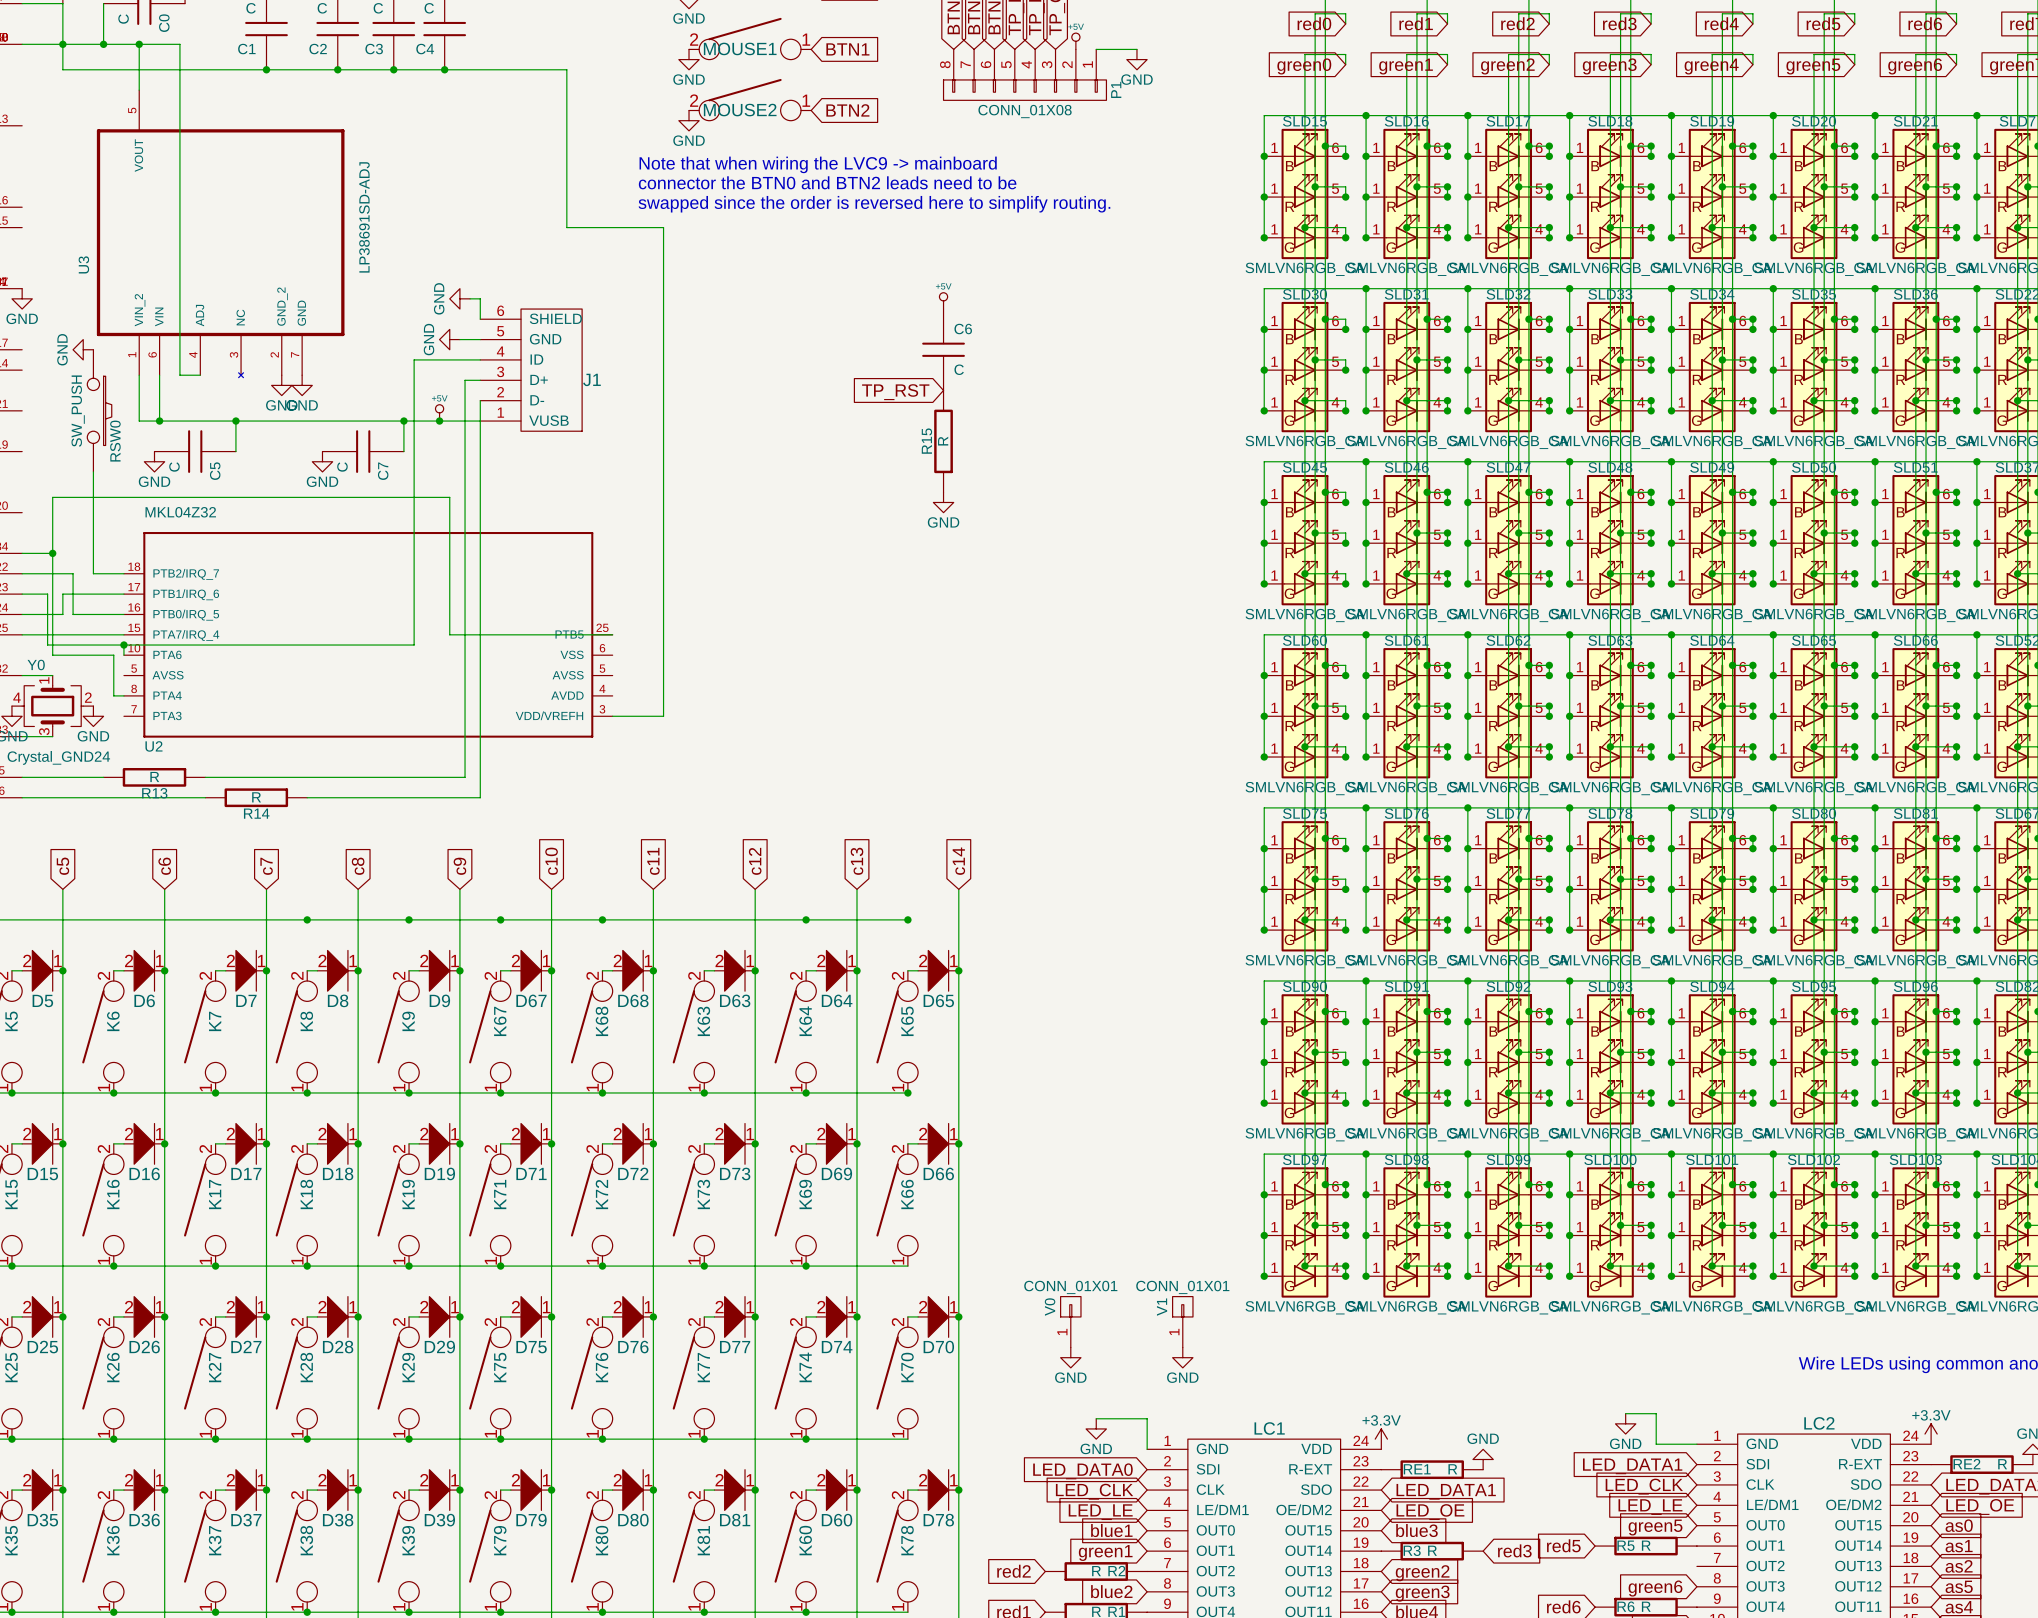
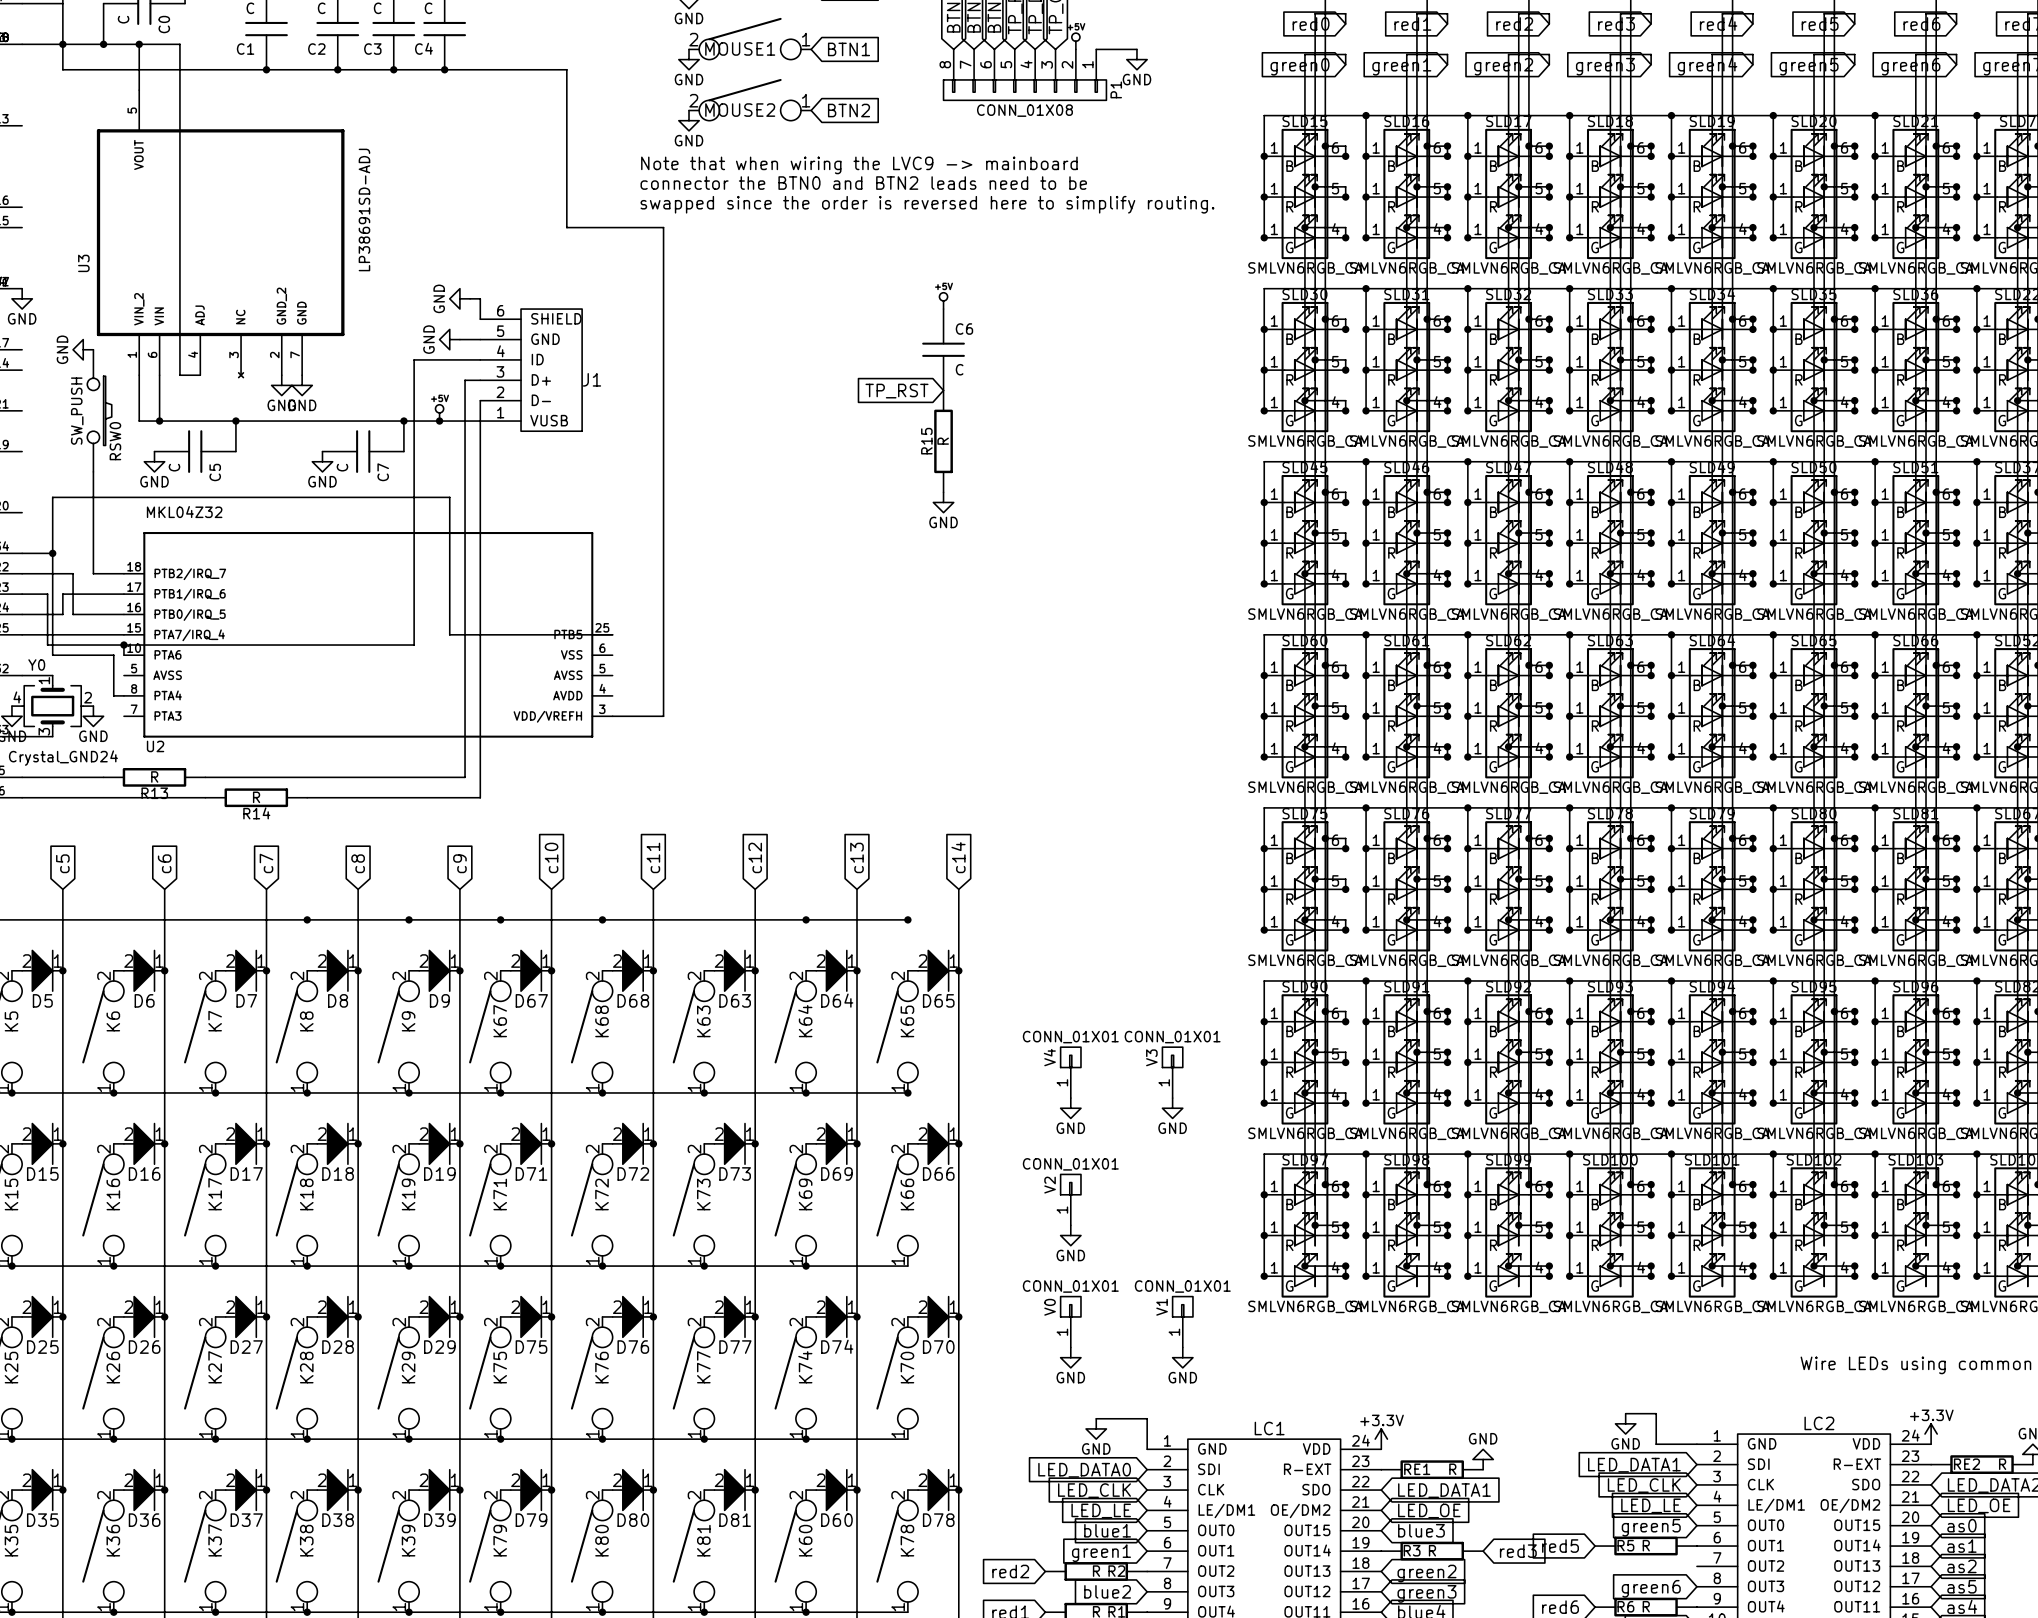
V4: none -> CONN_01X01 (1070, 1072)
V3: none -> CONN_01X01 (1172, 1072)
power symbol: none -> GND (1070, 1108)
power symbol: none -> GND (1172, 1108)
V2: none -> CONN_01X01 (1070, 1199)
power symbol: none -> GND (1070, 1235)

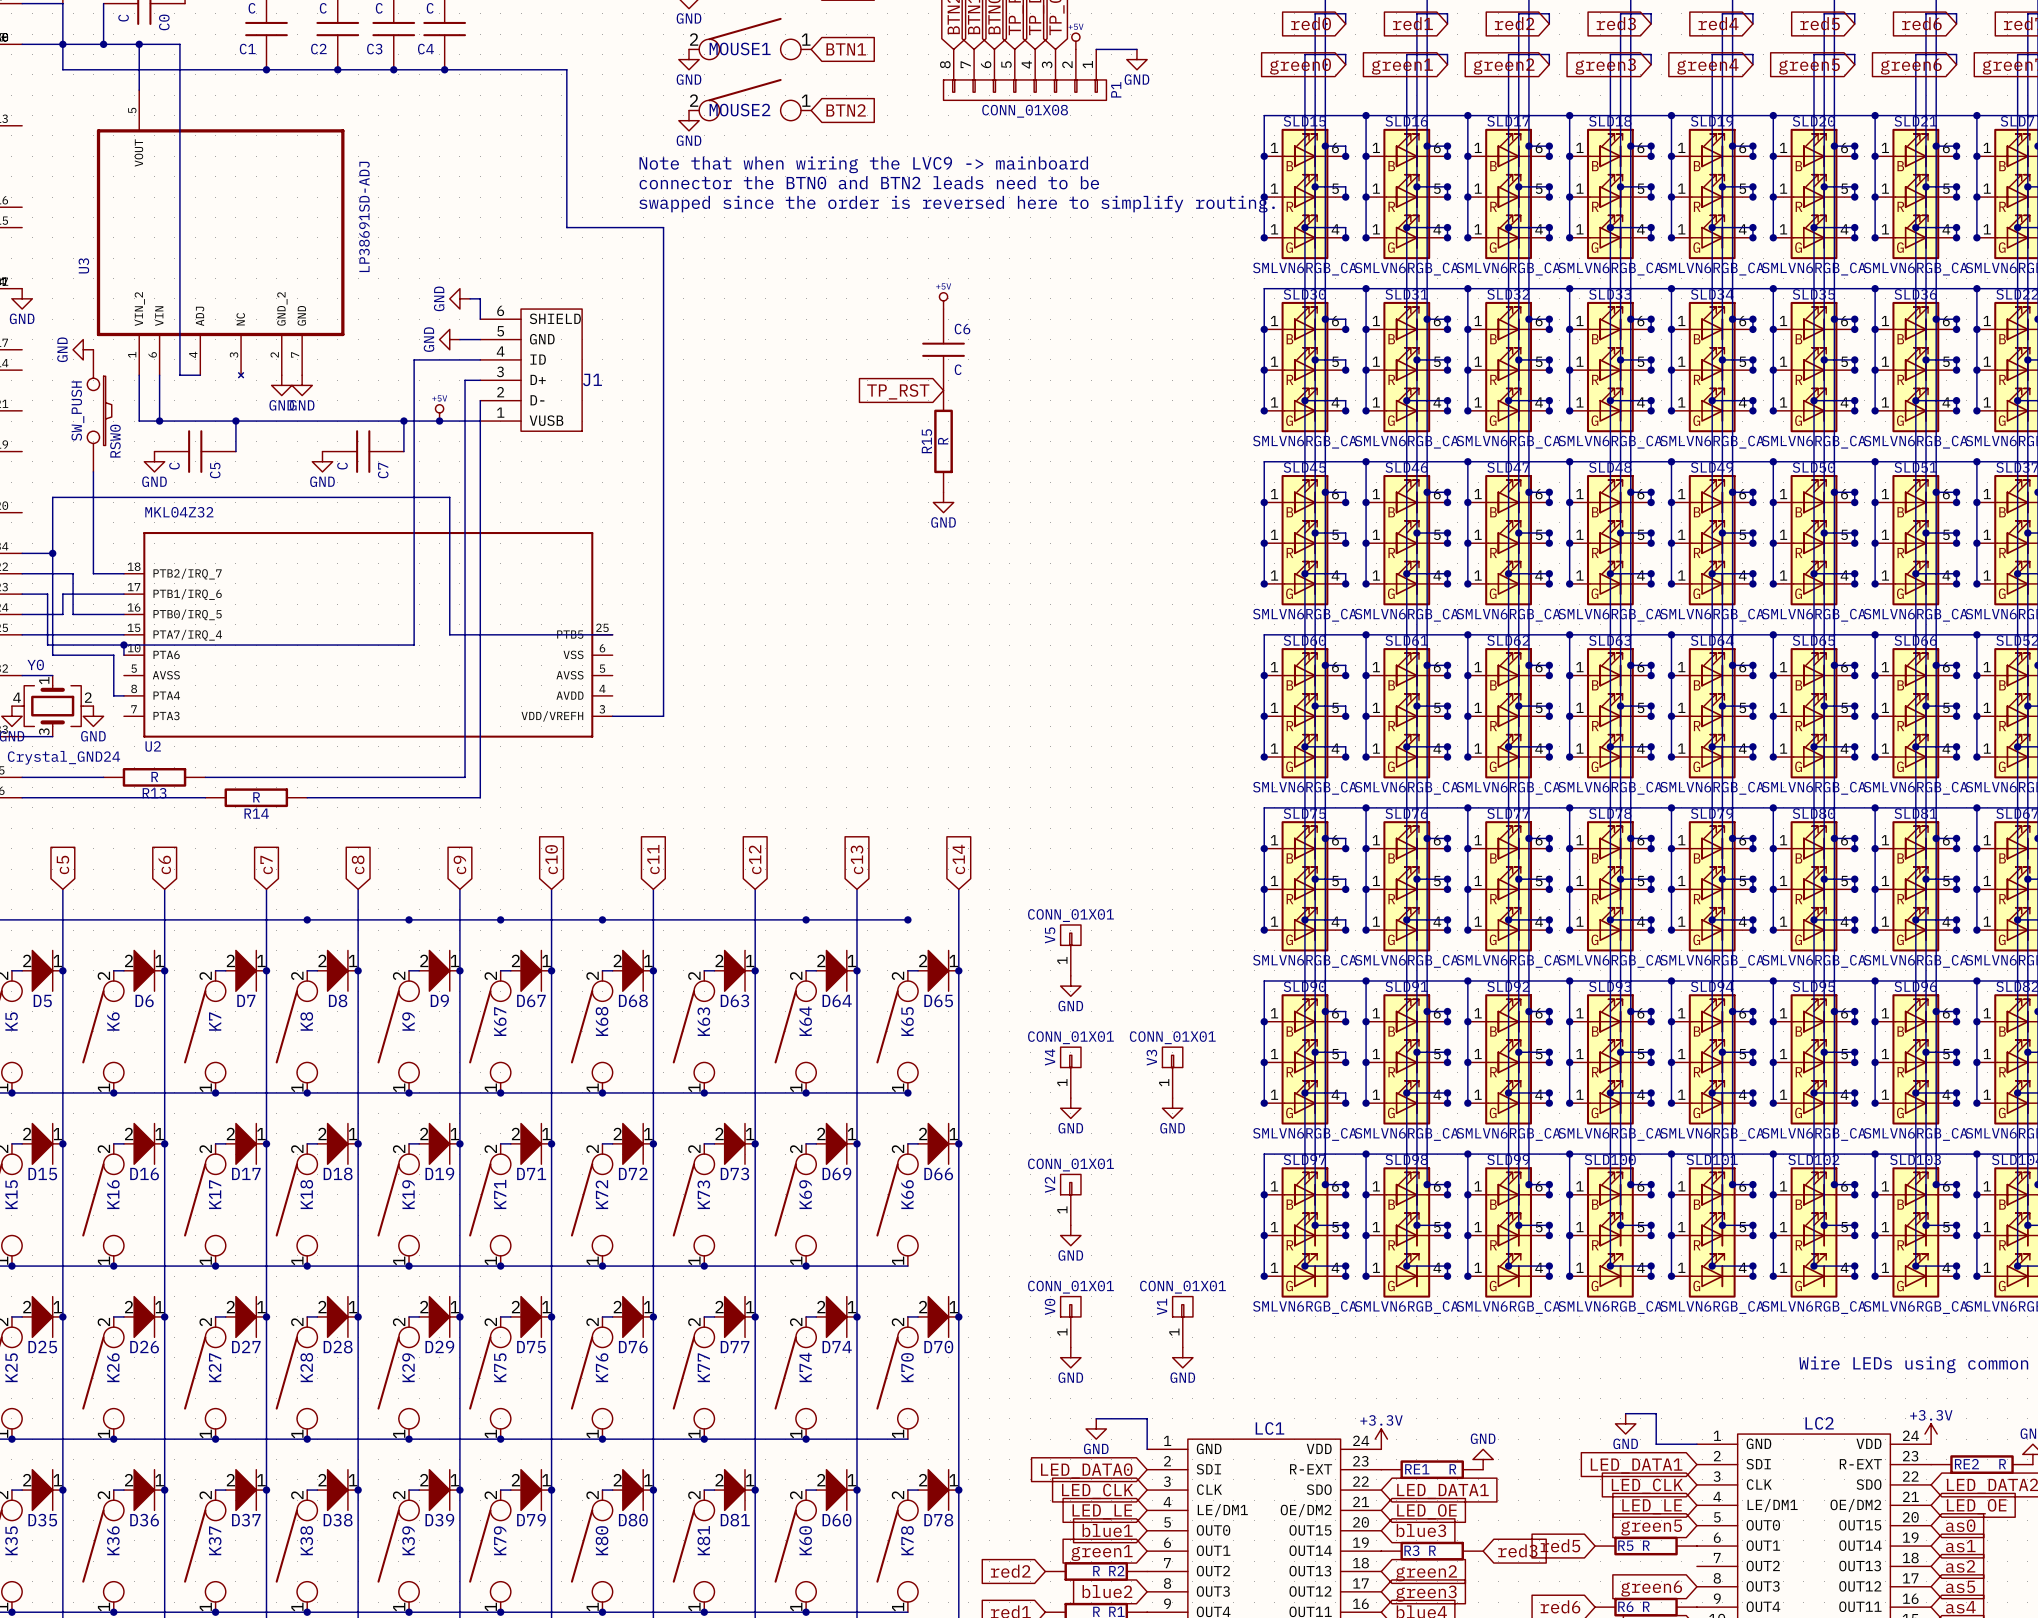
V5: none -> CONN_01X01 (1070, 950)
power symbol: none -> GND (1070, 986)

